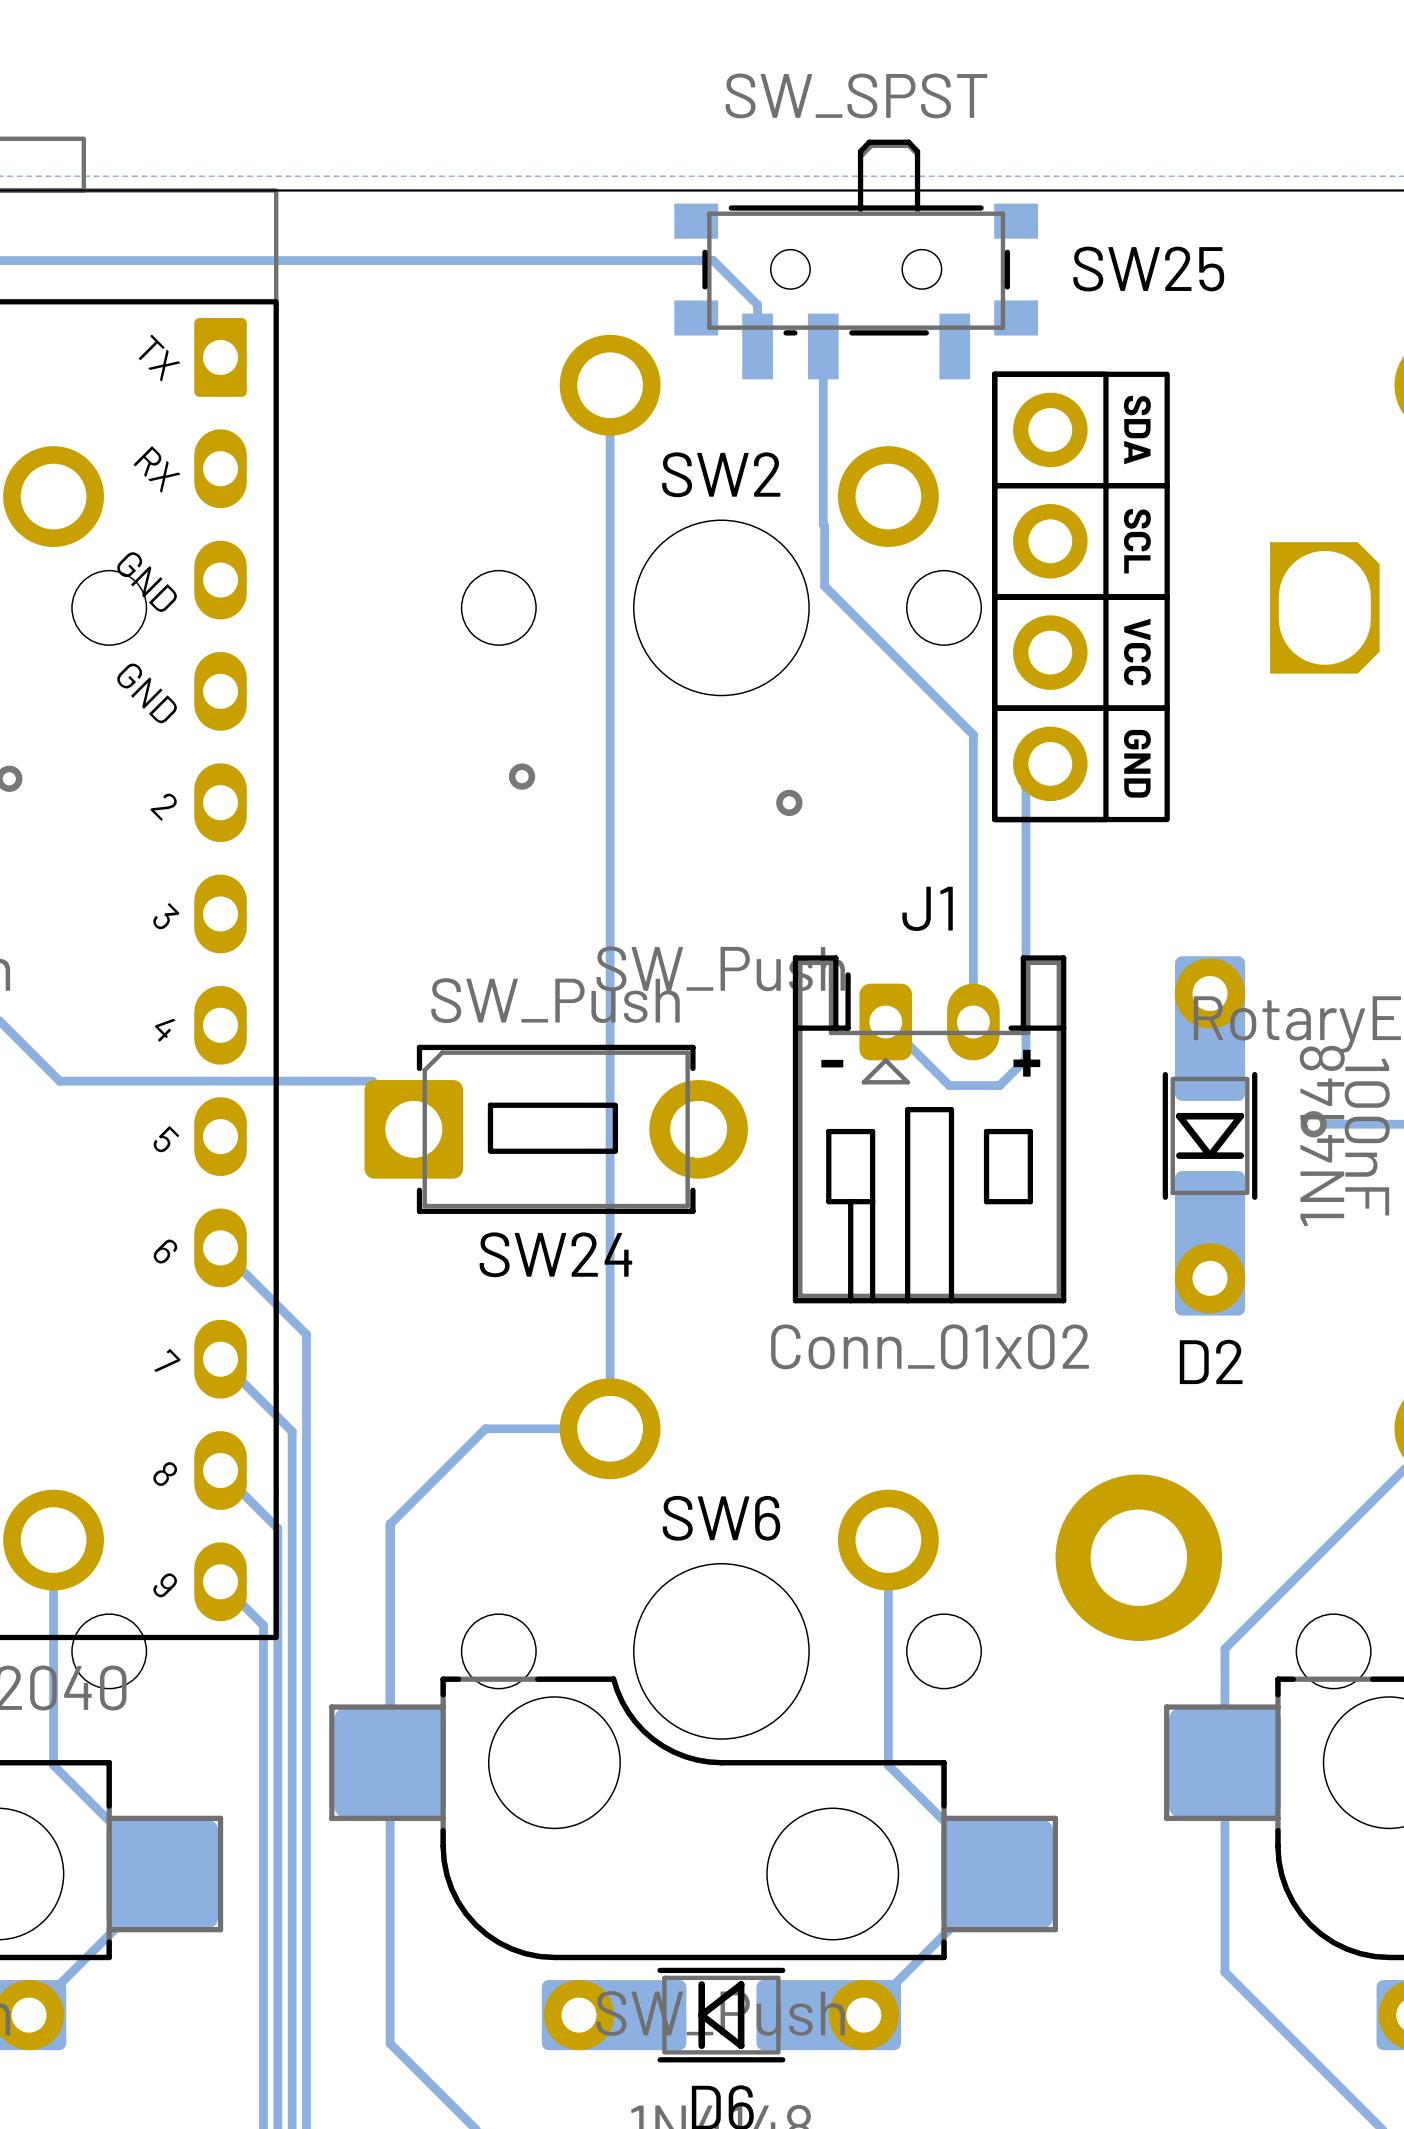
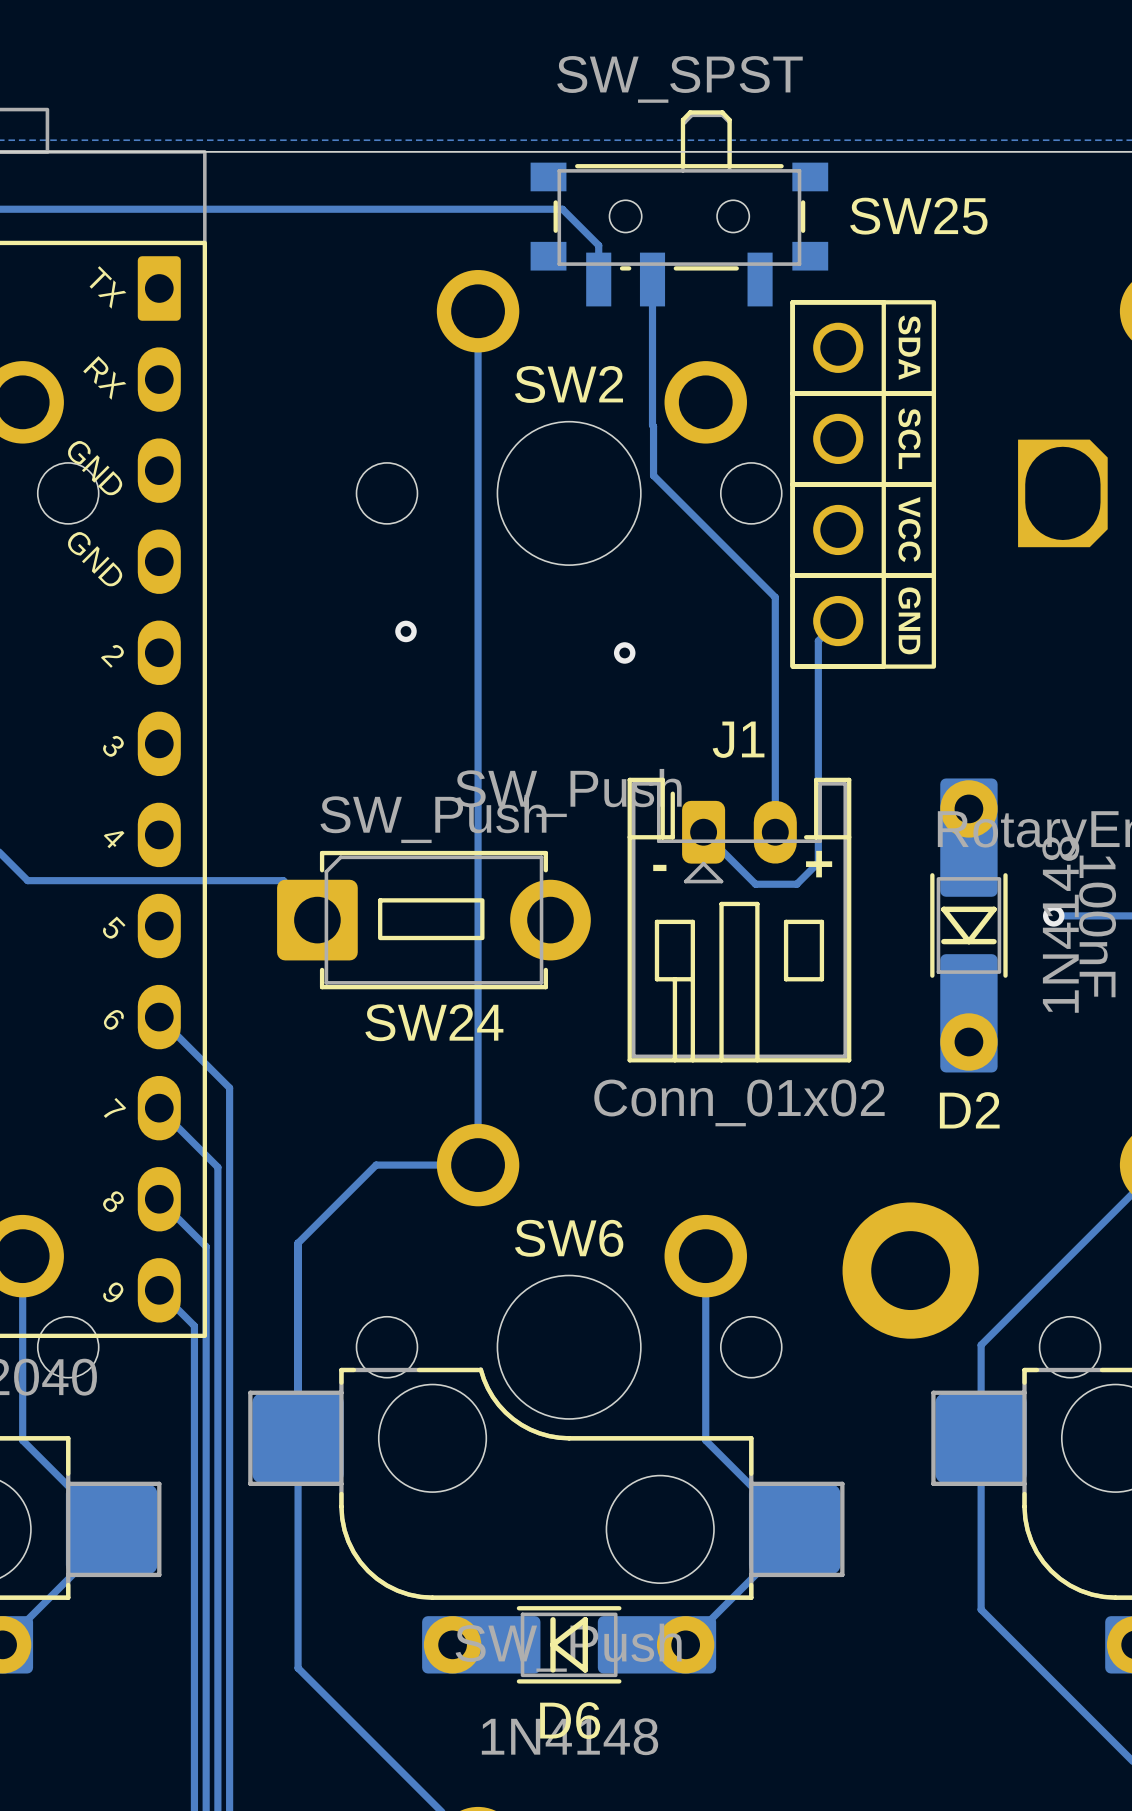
part footprint: [992, 371, 1170, 823] -> [790, 300, 937, 669]

